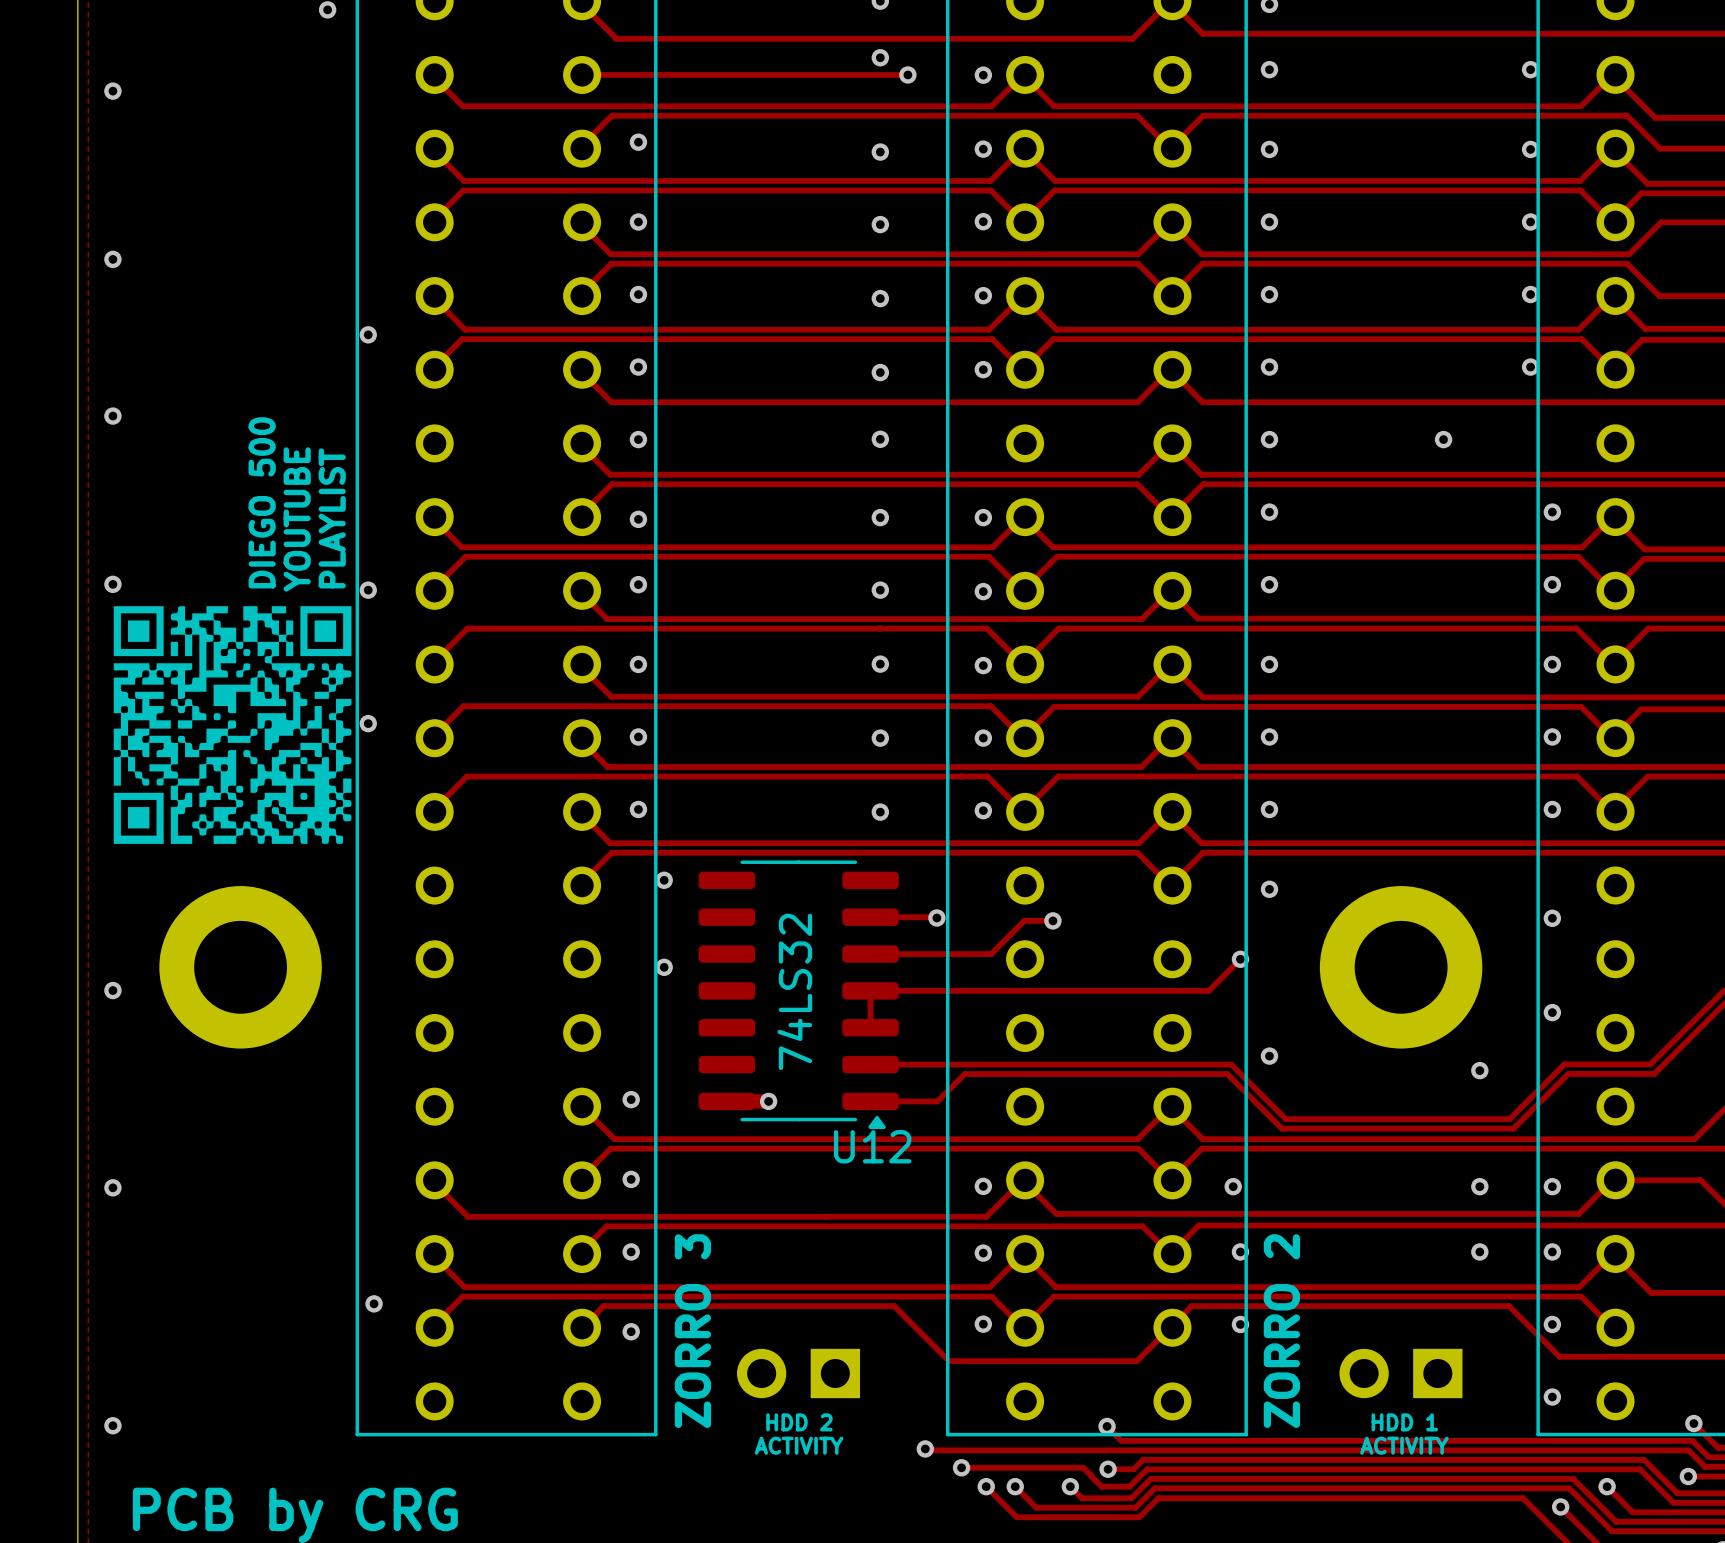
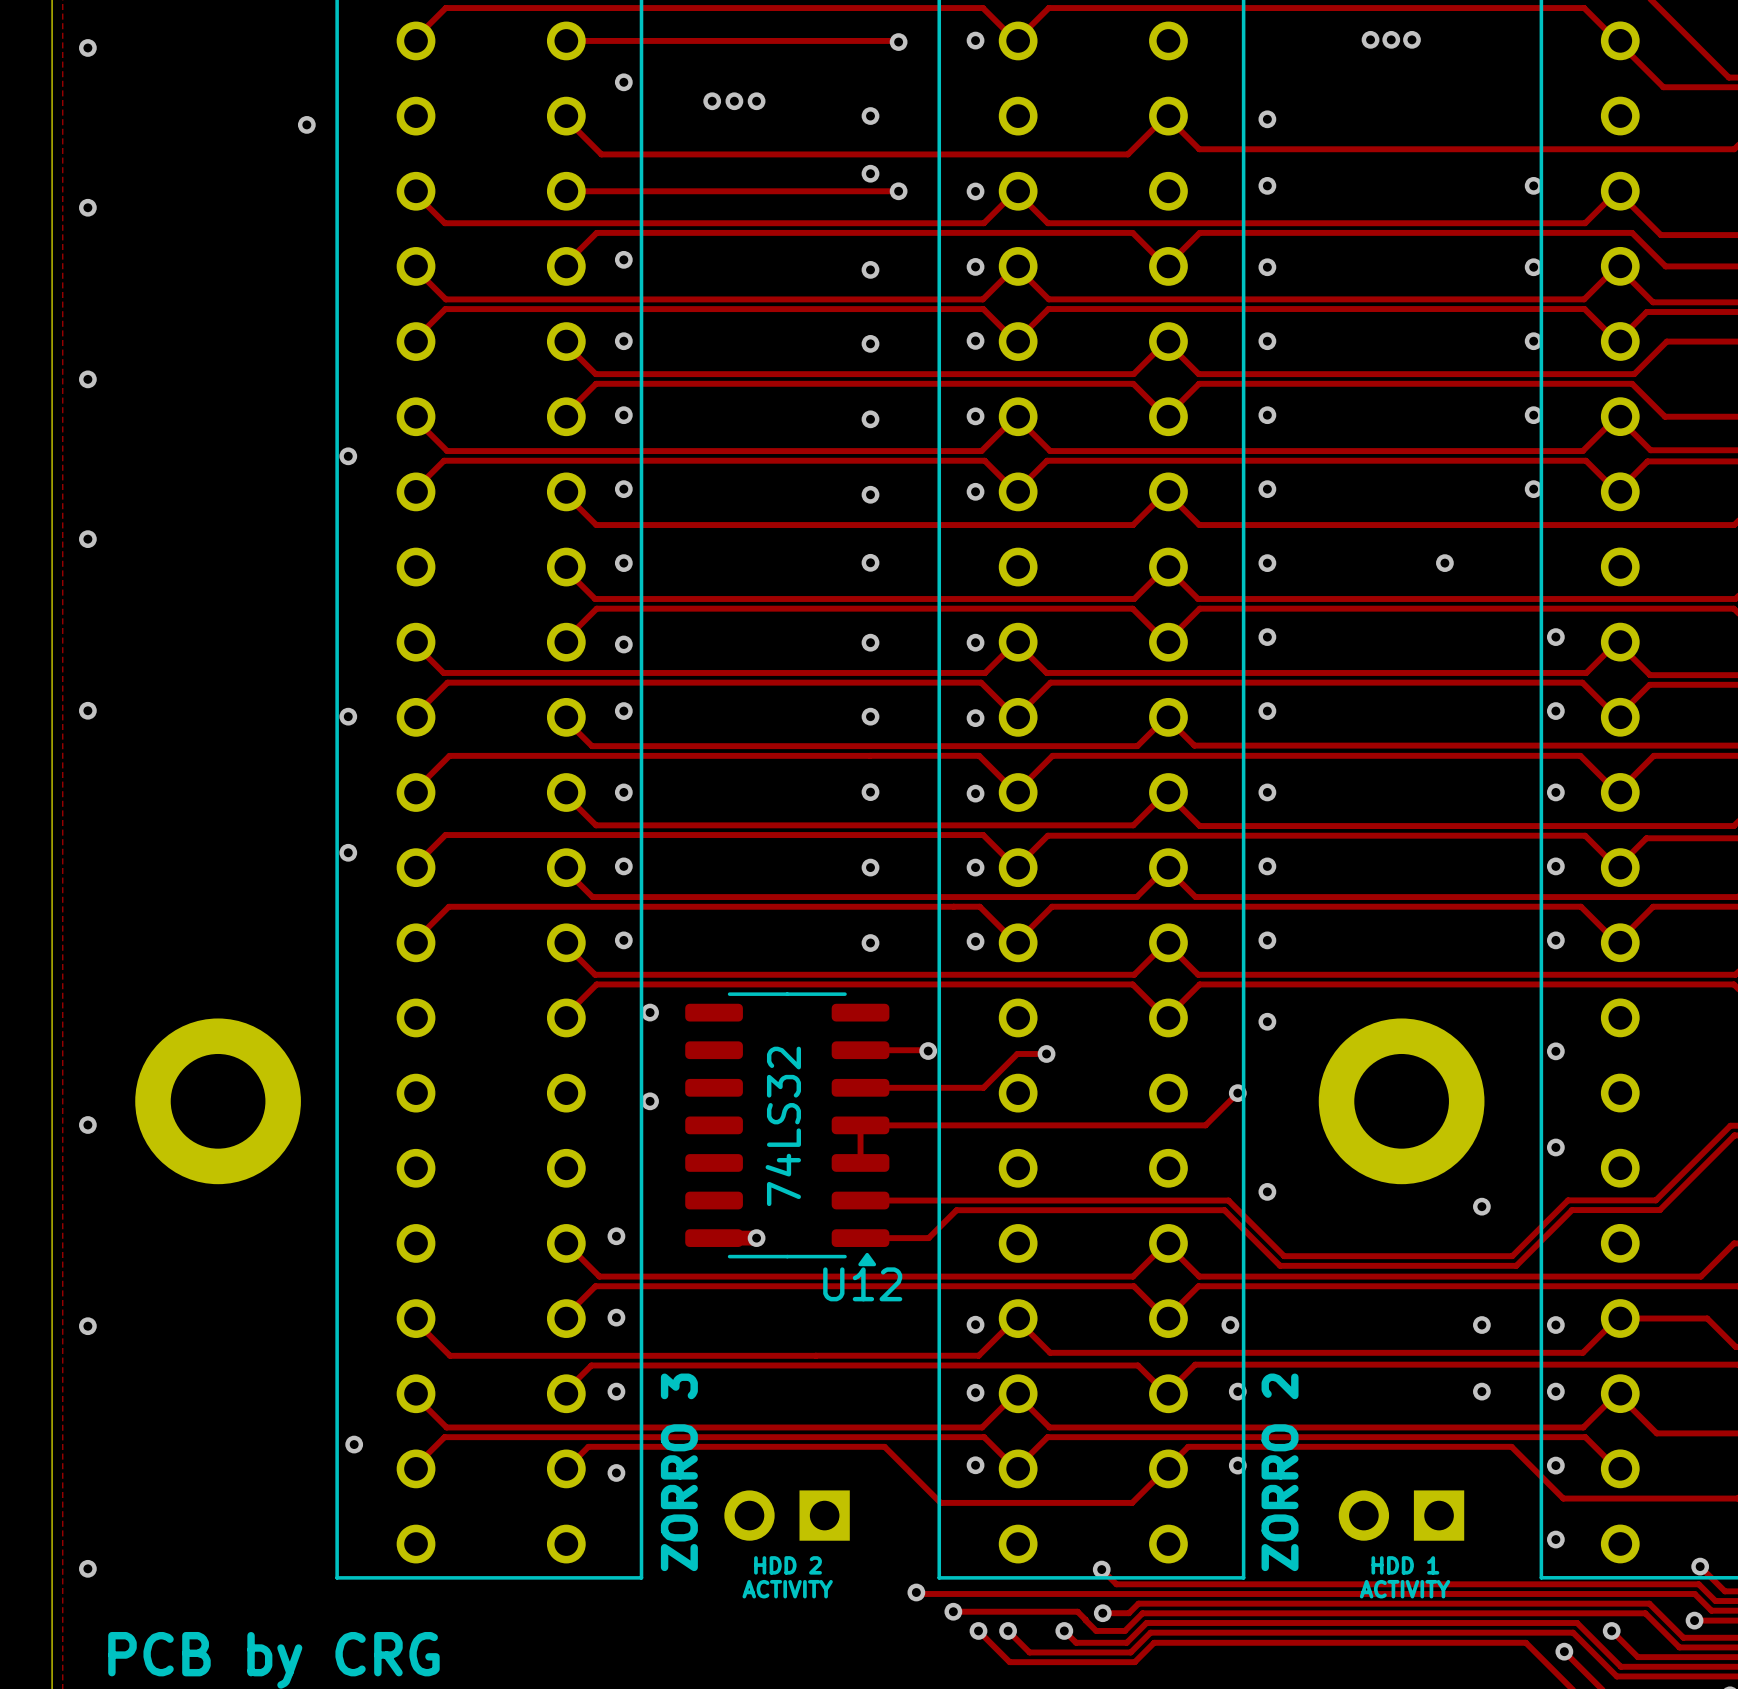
text: DIEGO 500 (262, 502) -> none
text: PLAYLIST (332, 518) -> none
text: YOUTUBE (297, 519) -> none
drawing: [113, 606, 352, 844] -> none

